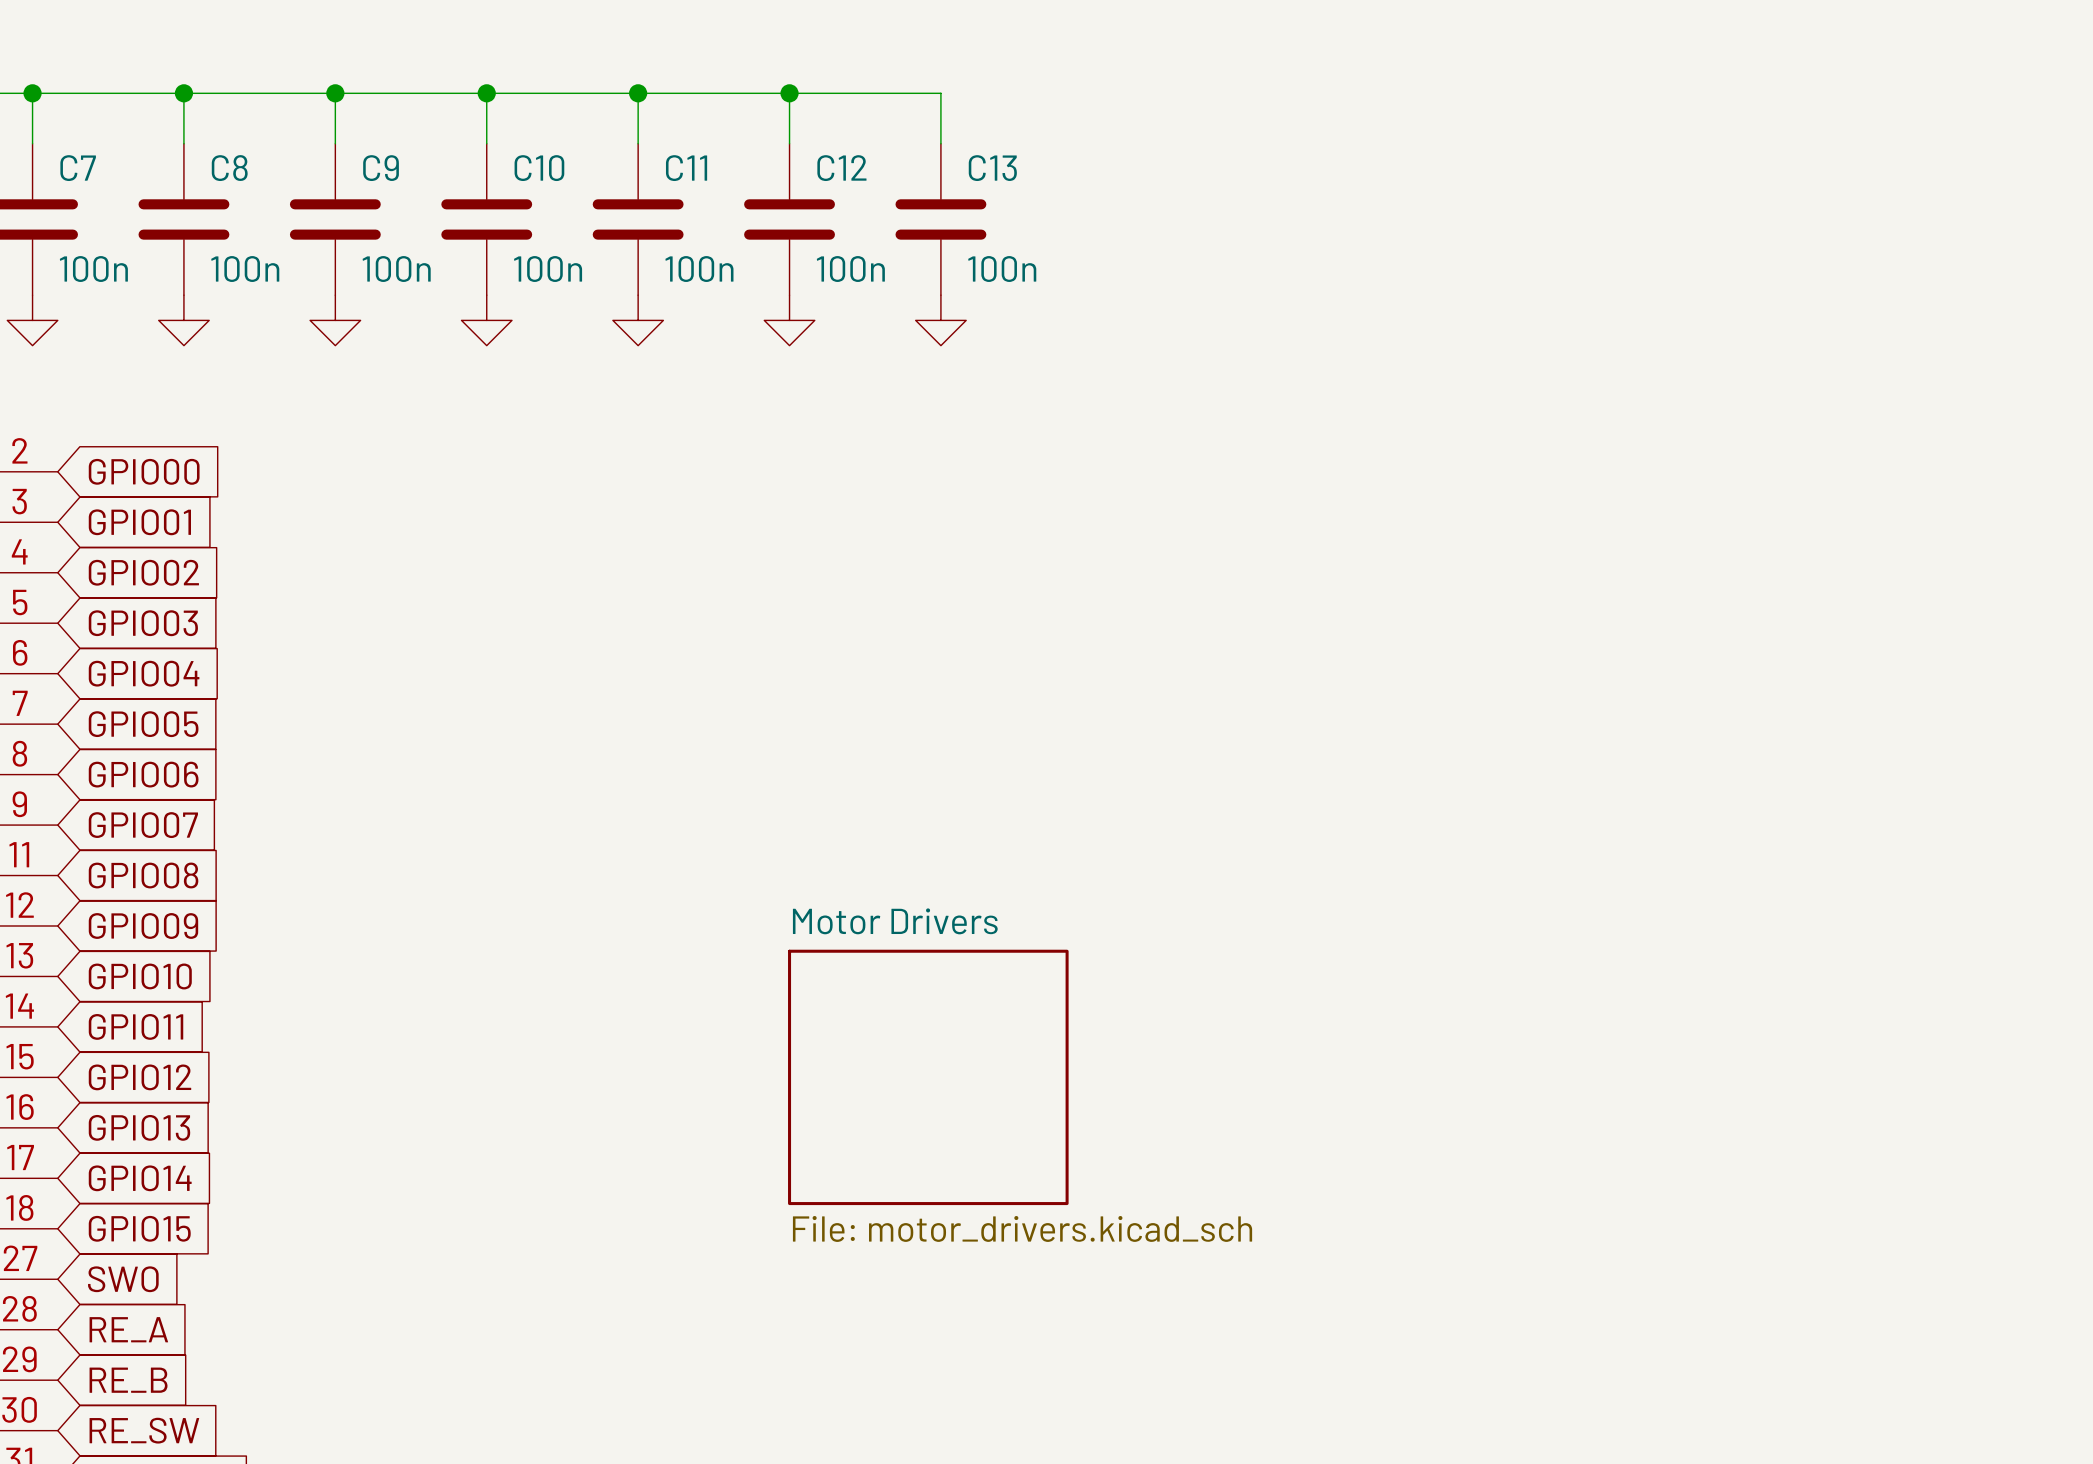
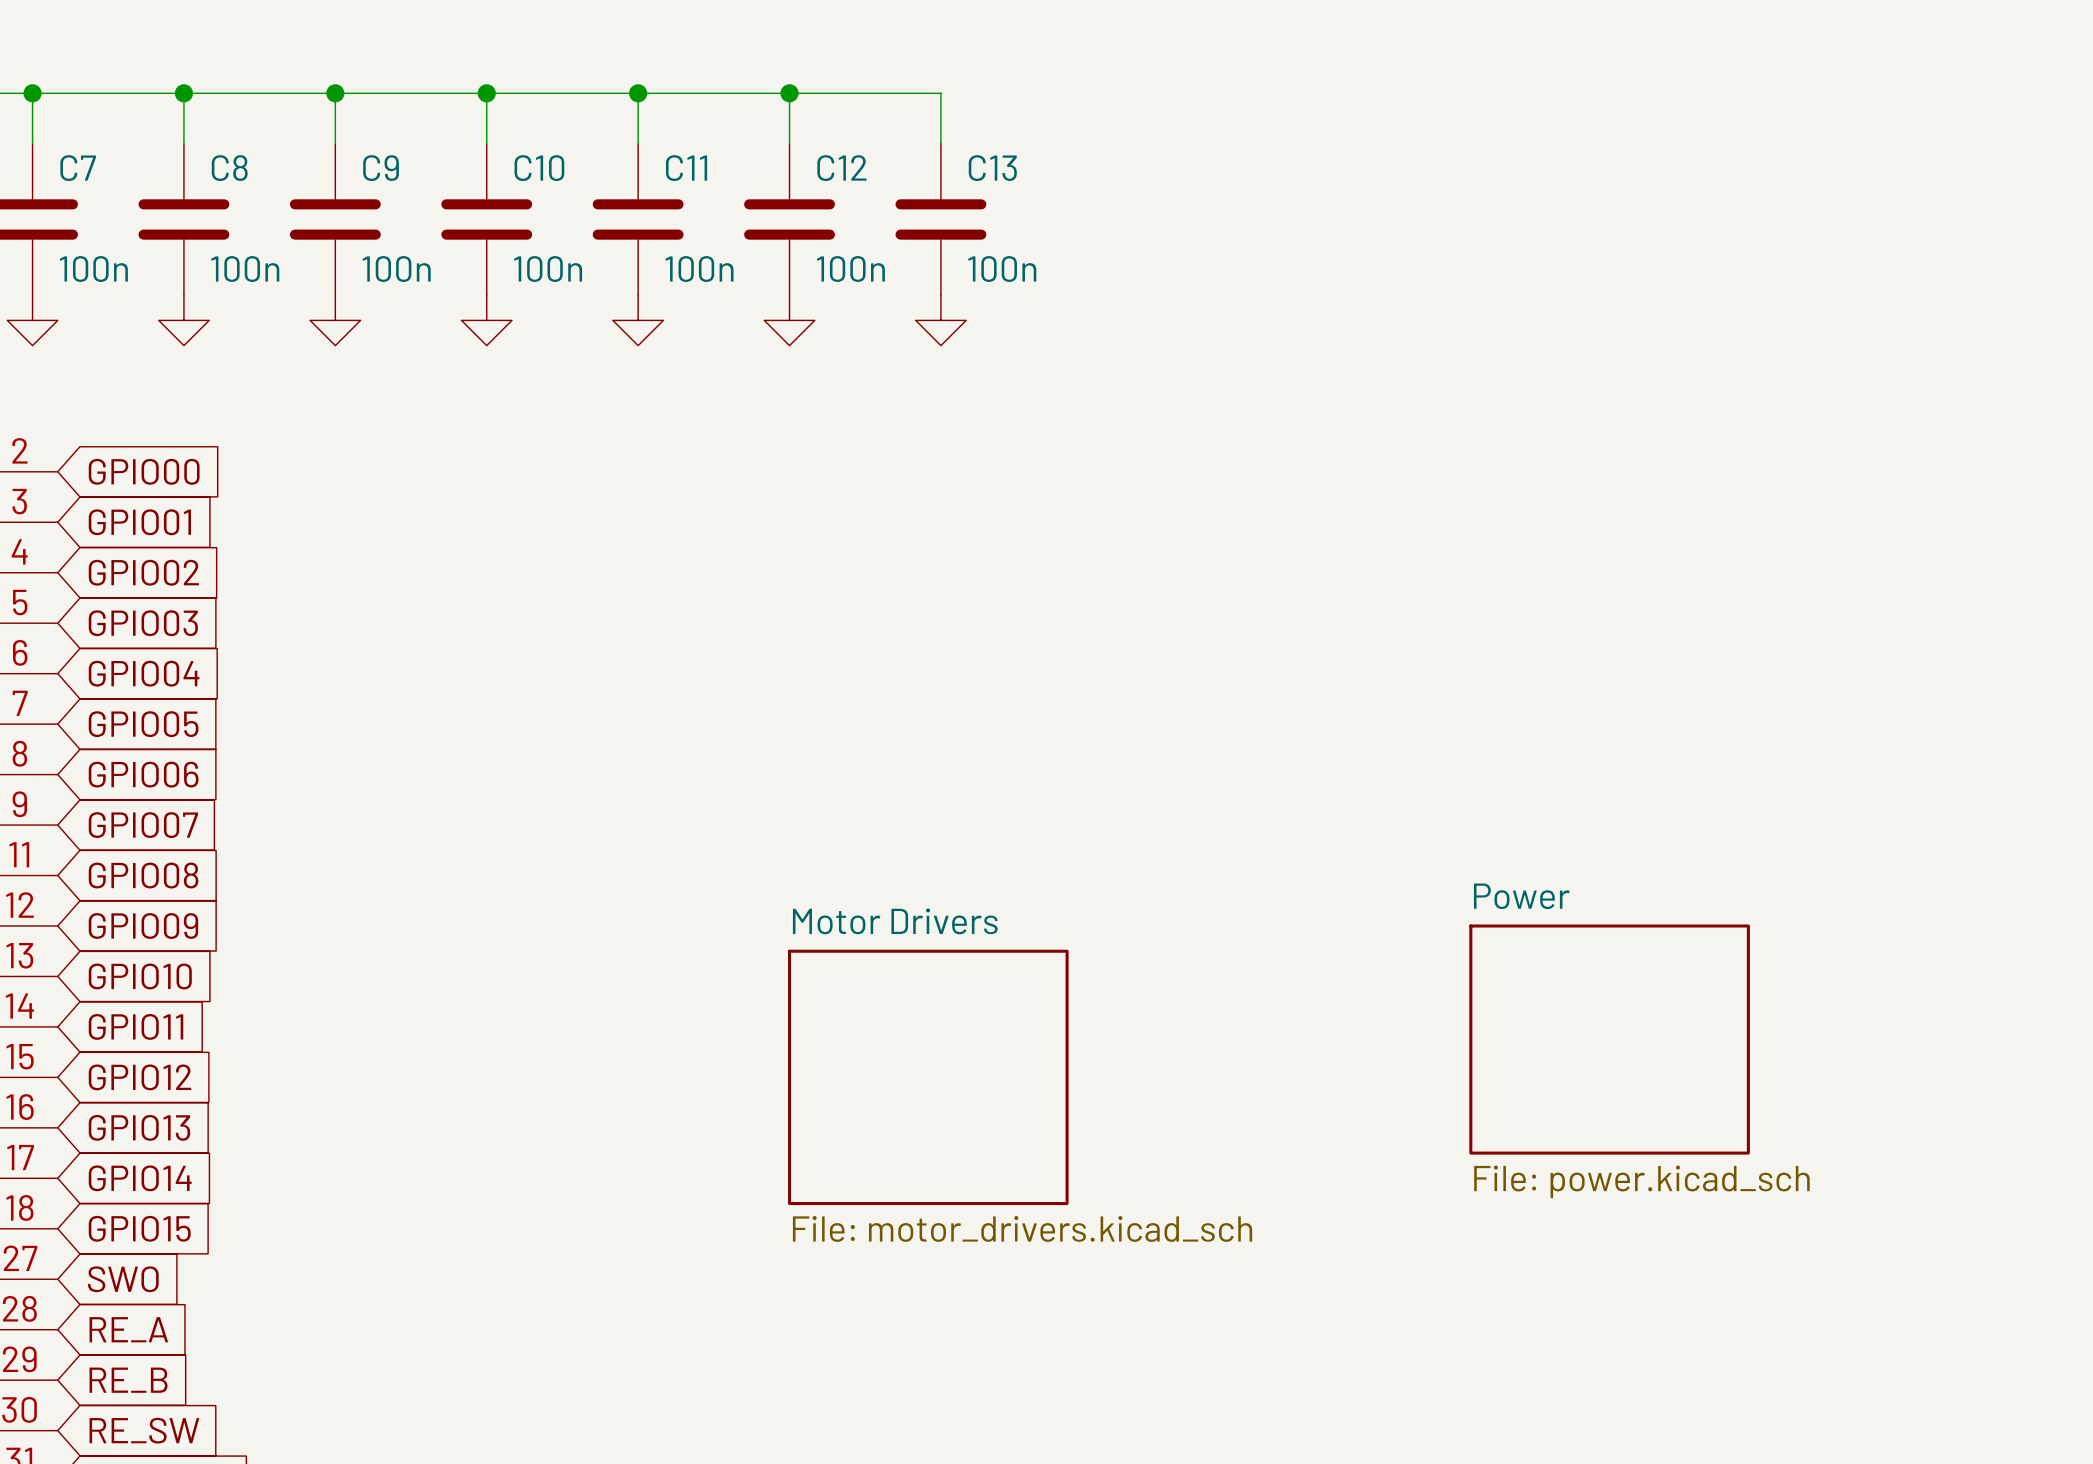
sheet Power: none -> File: power.kicad_sch (1609, 1039)

